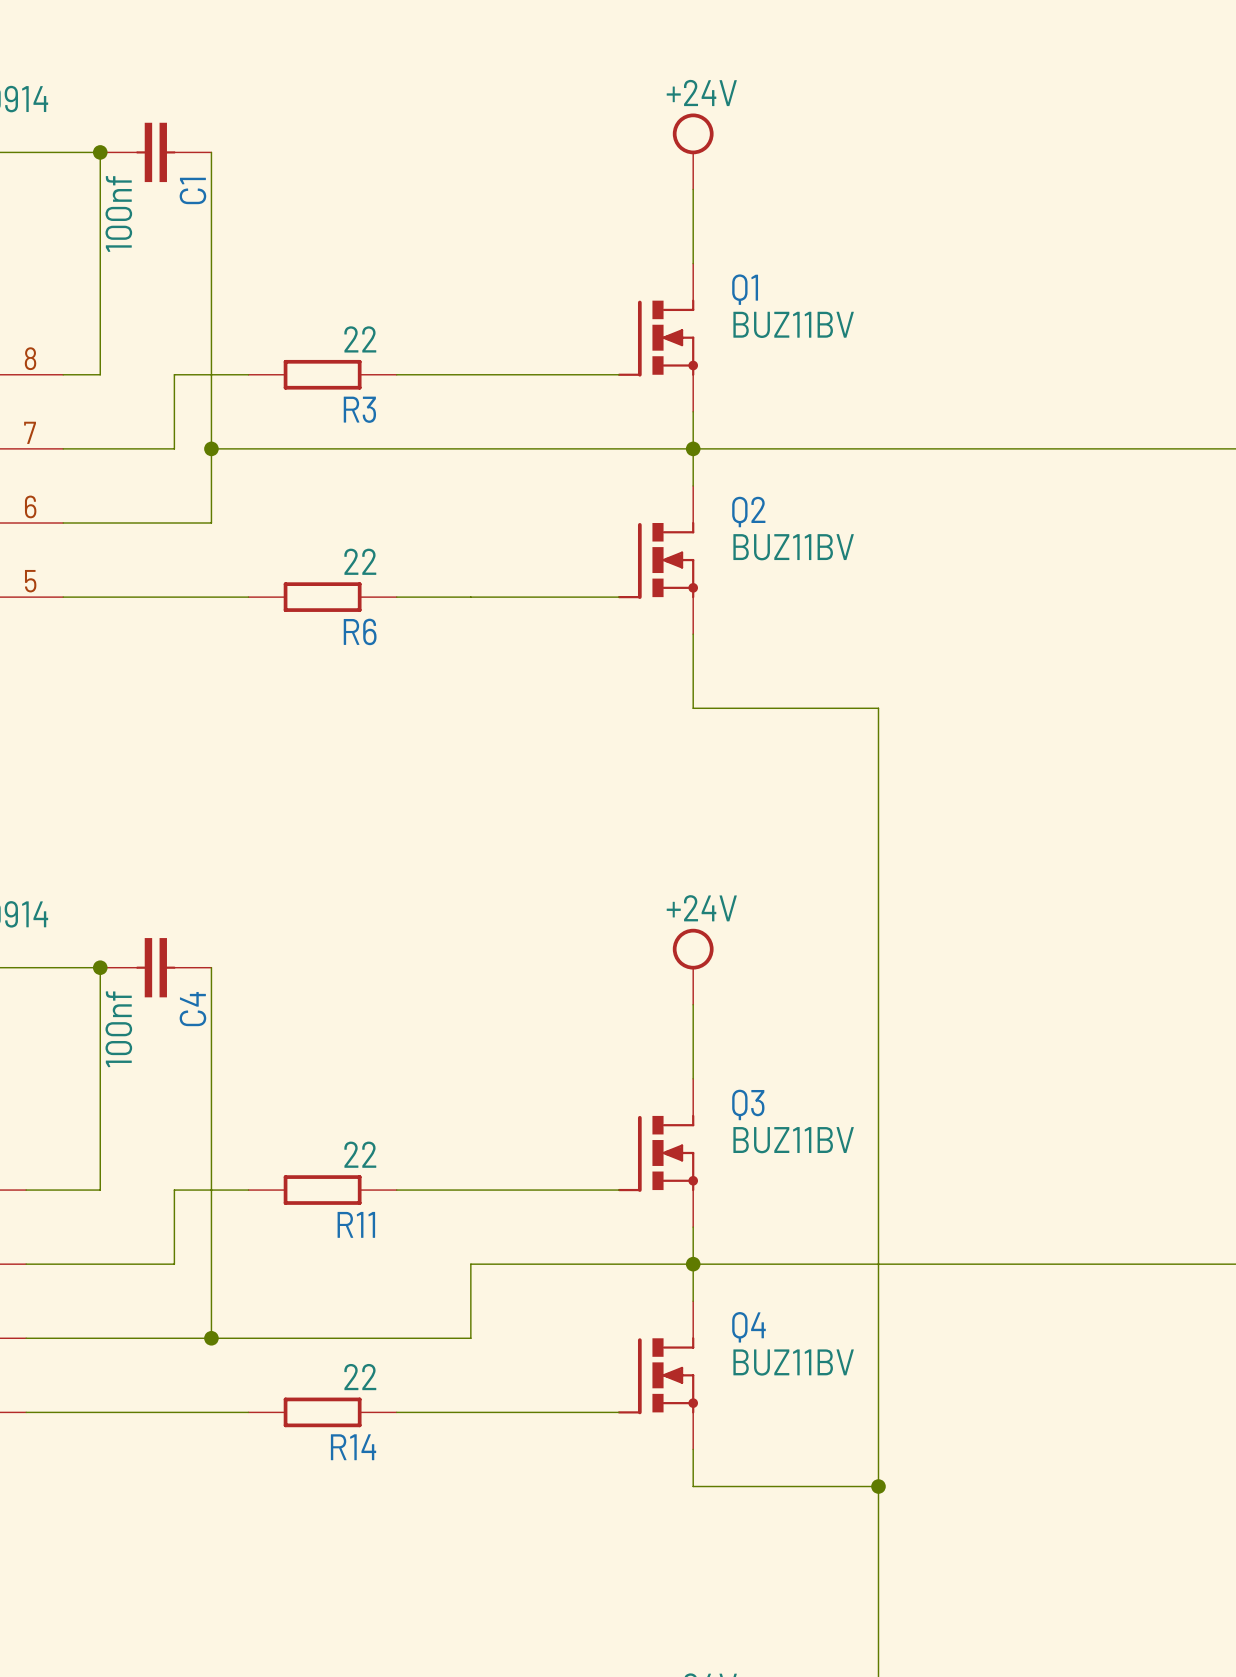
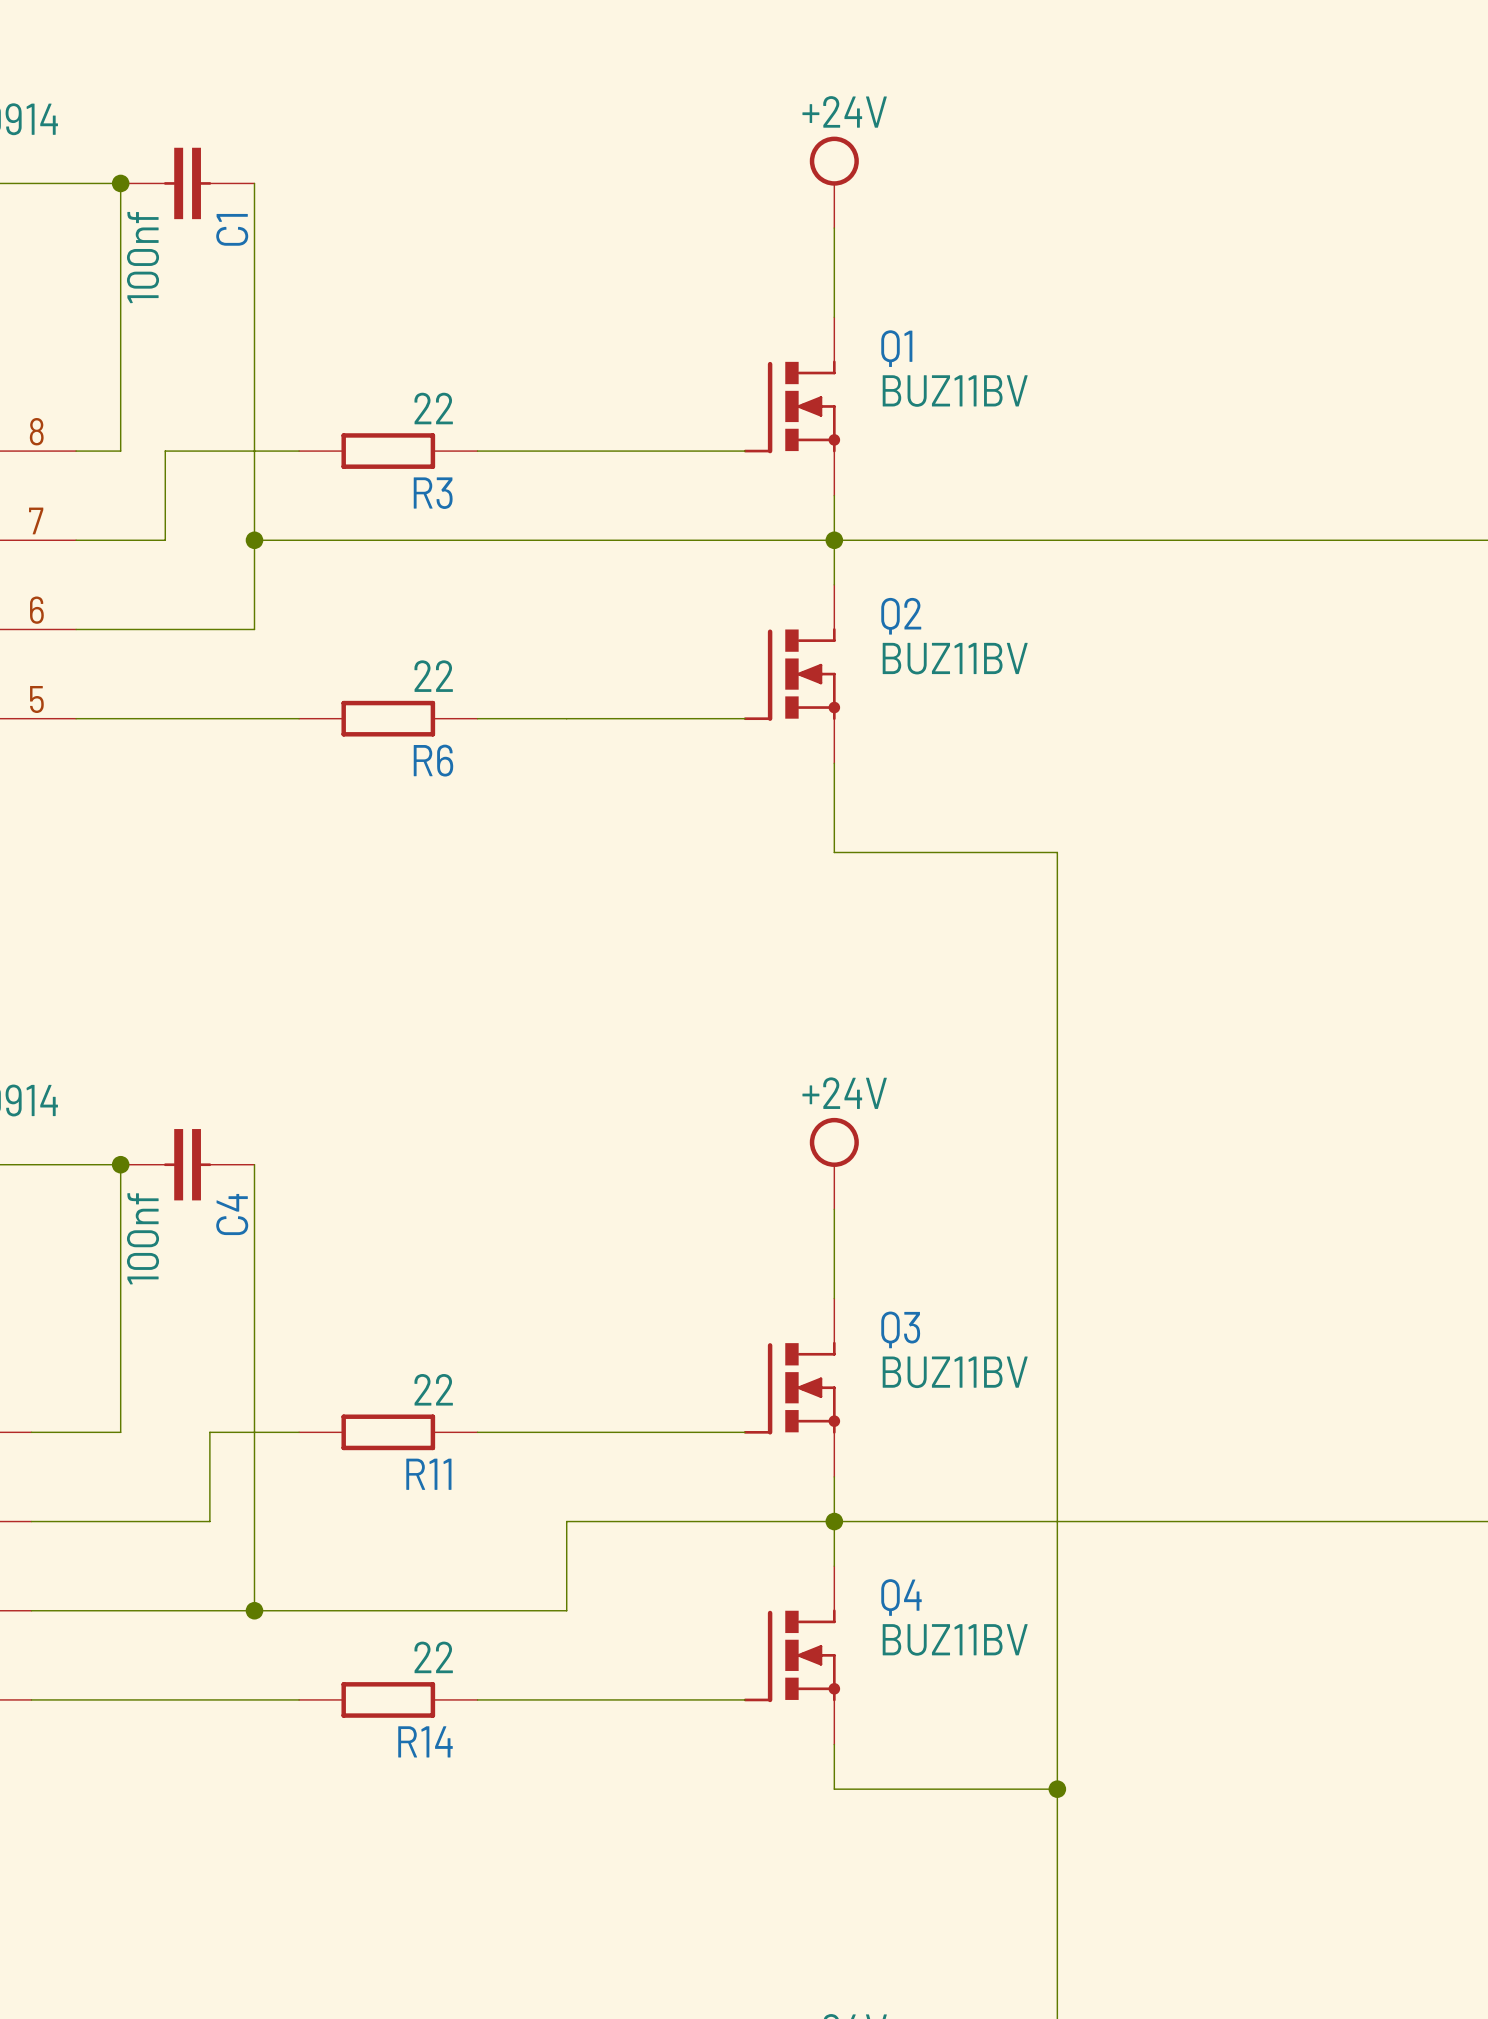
wire: (174, 374) (174, 448) (137, 448) -> (209, 451) (165, 451) (165, 540)

